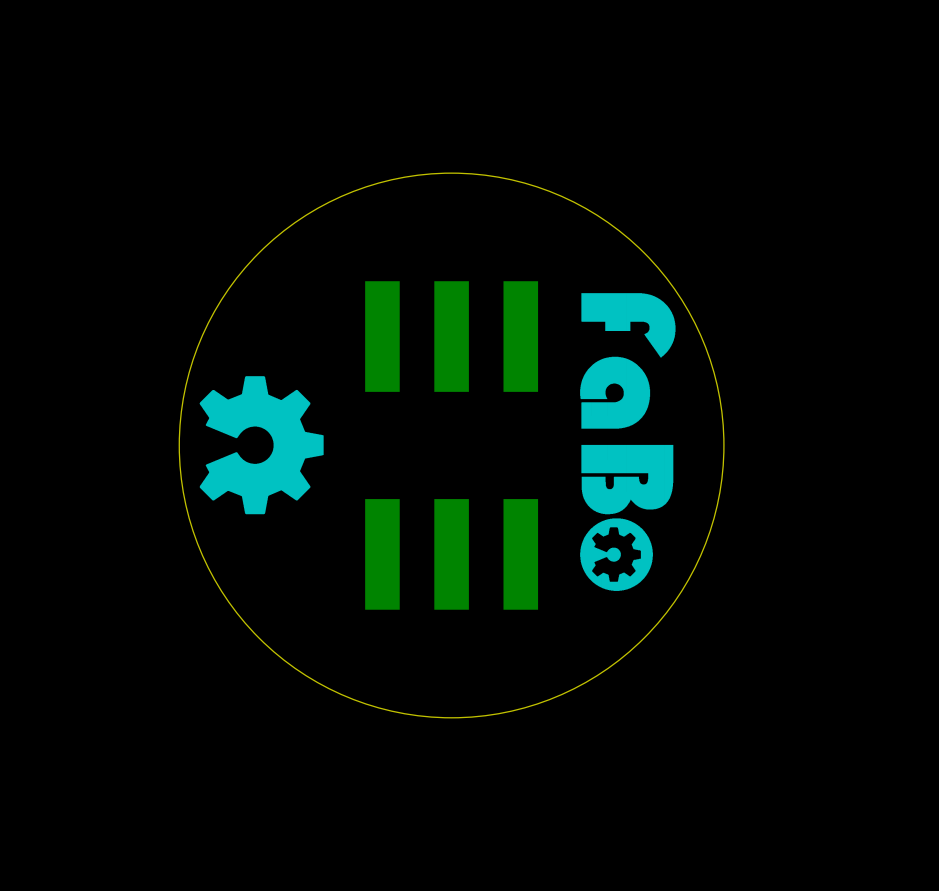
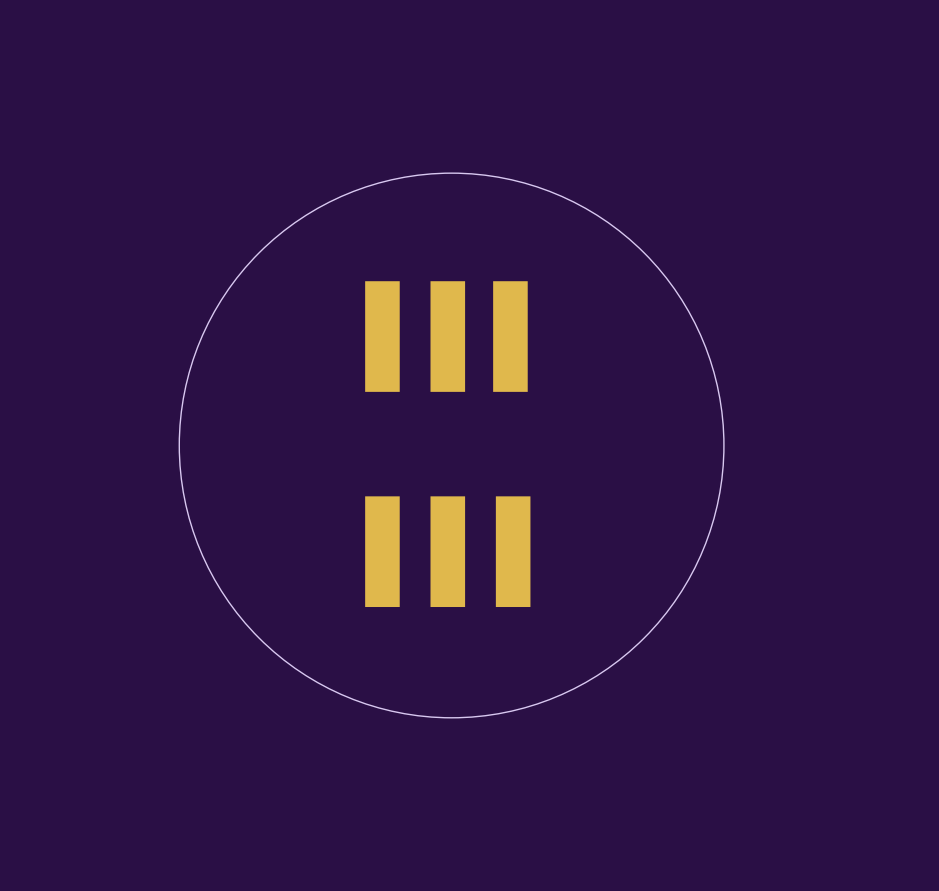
part footprint: [179, 173, 724, 718] -> [178, 172, 725, 719]
drawing: [580, 293, 676, 591] -> none
drawing: [199, 376, 324, 515] -> none

